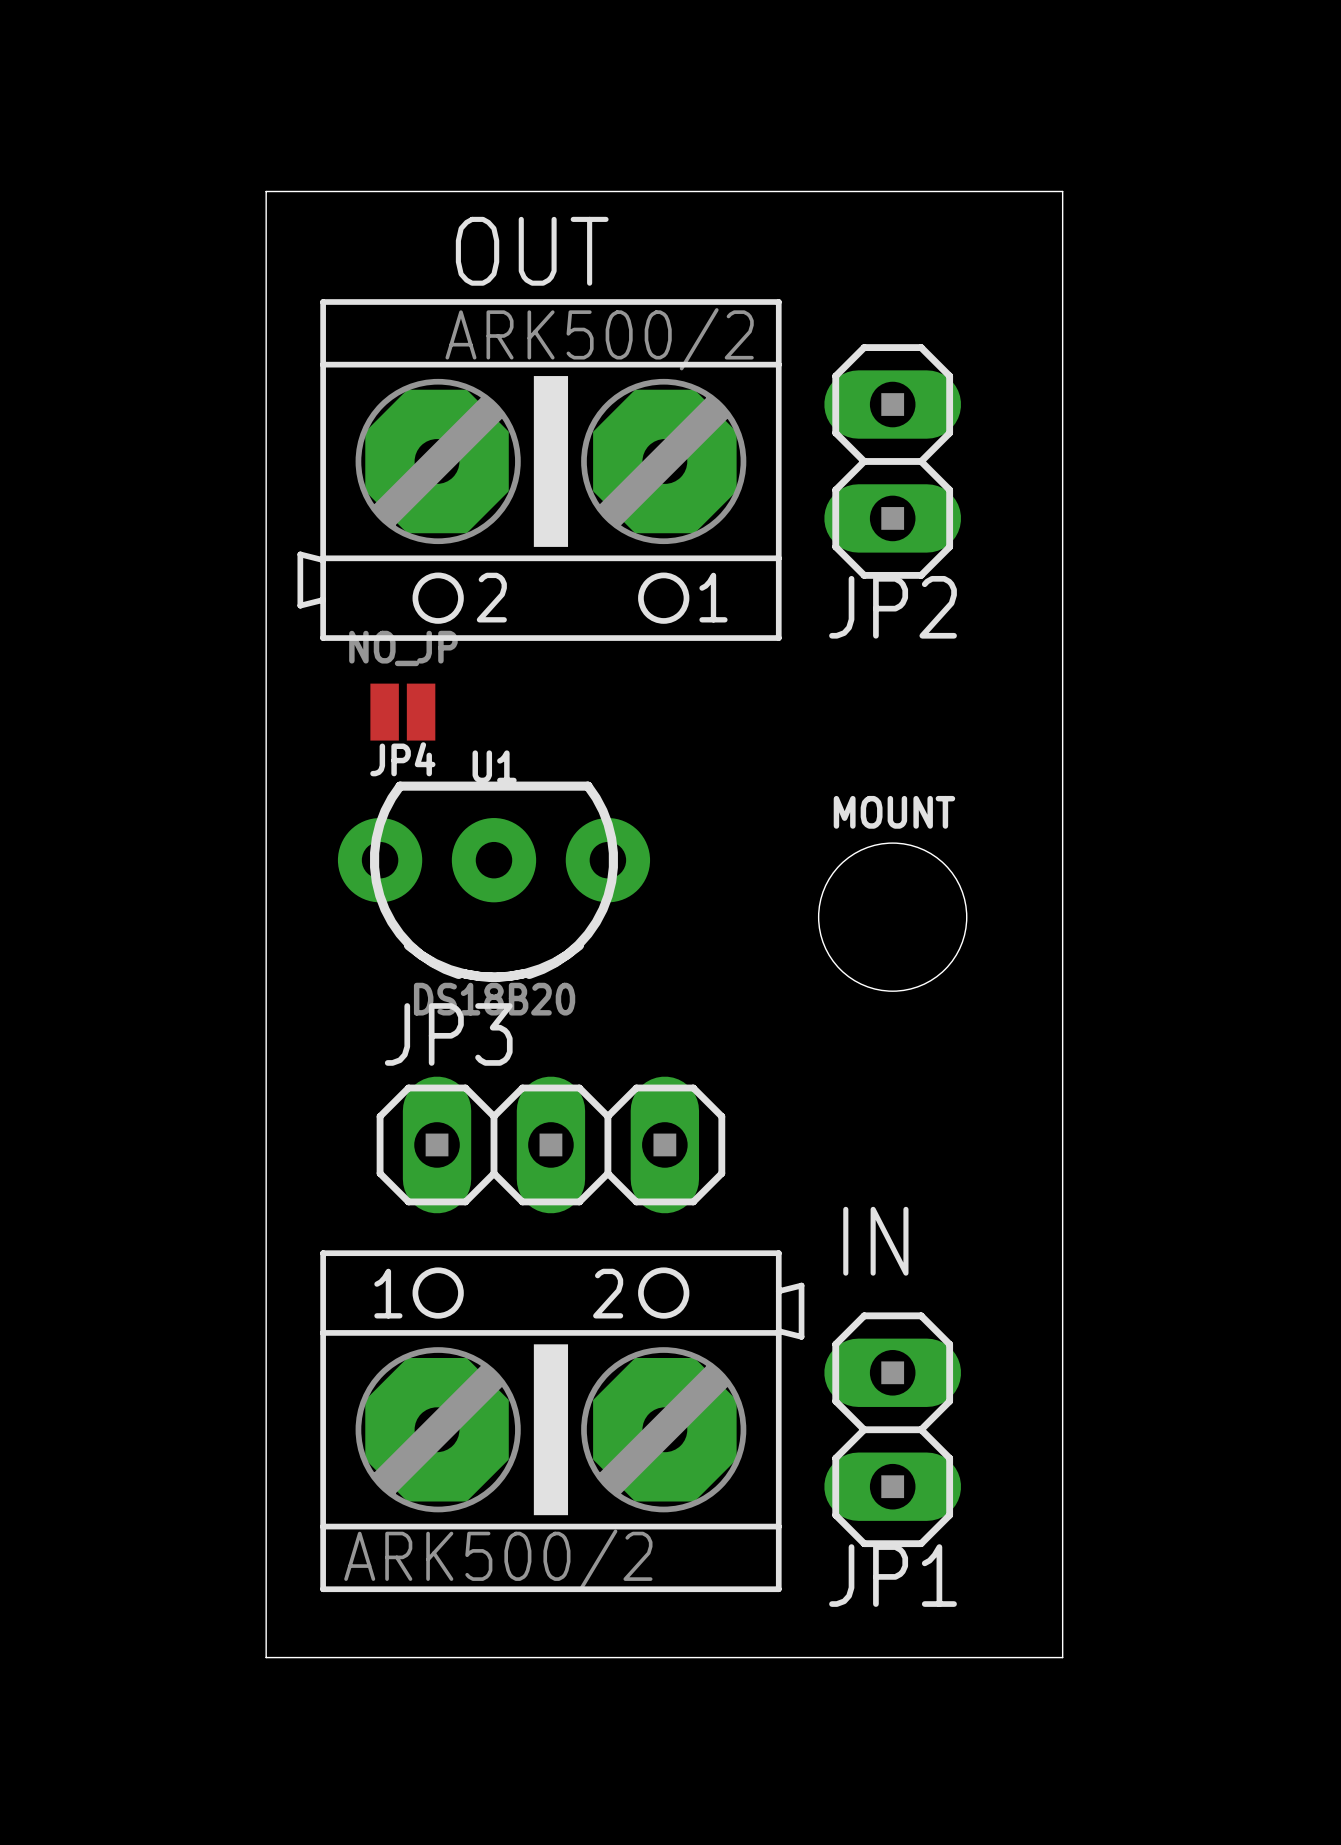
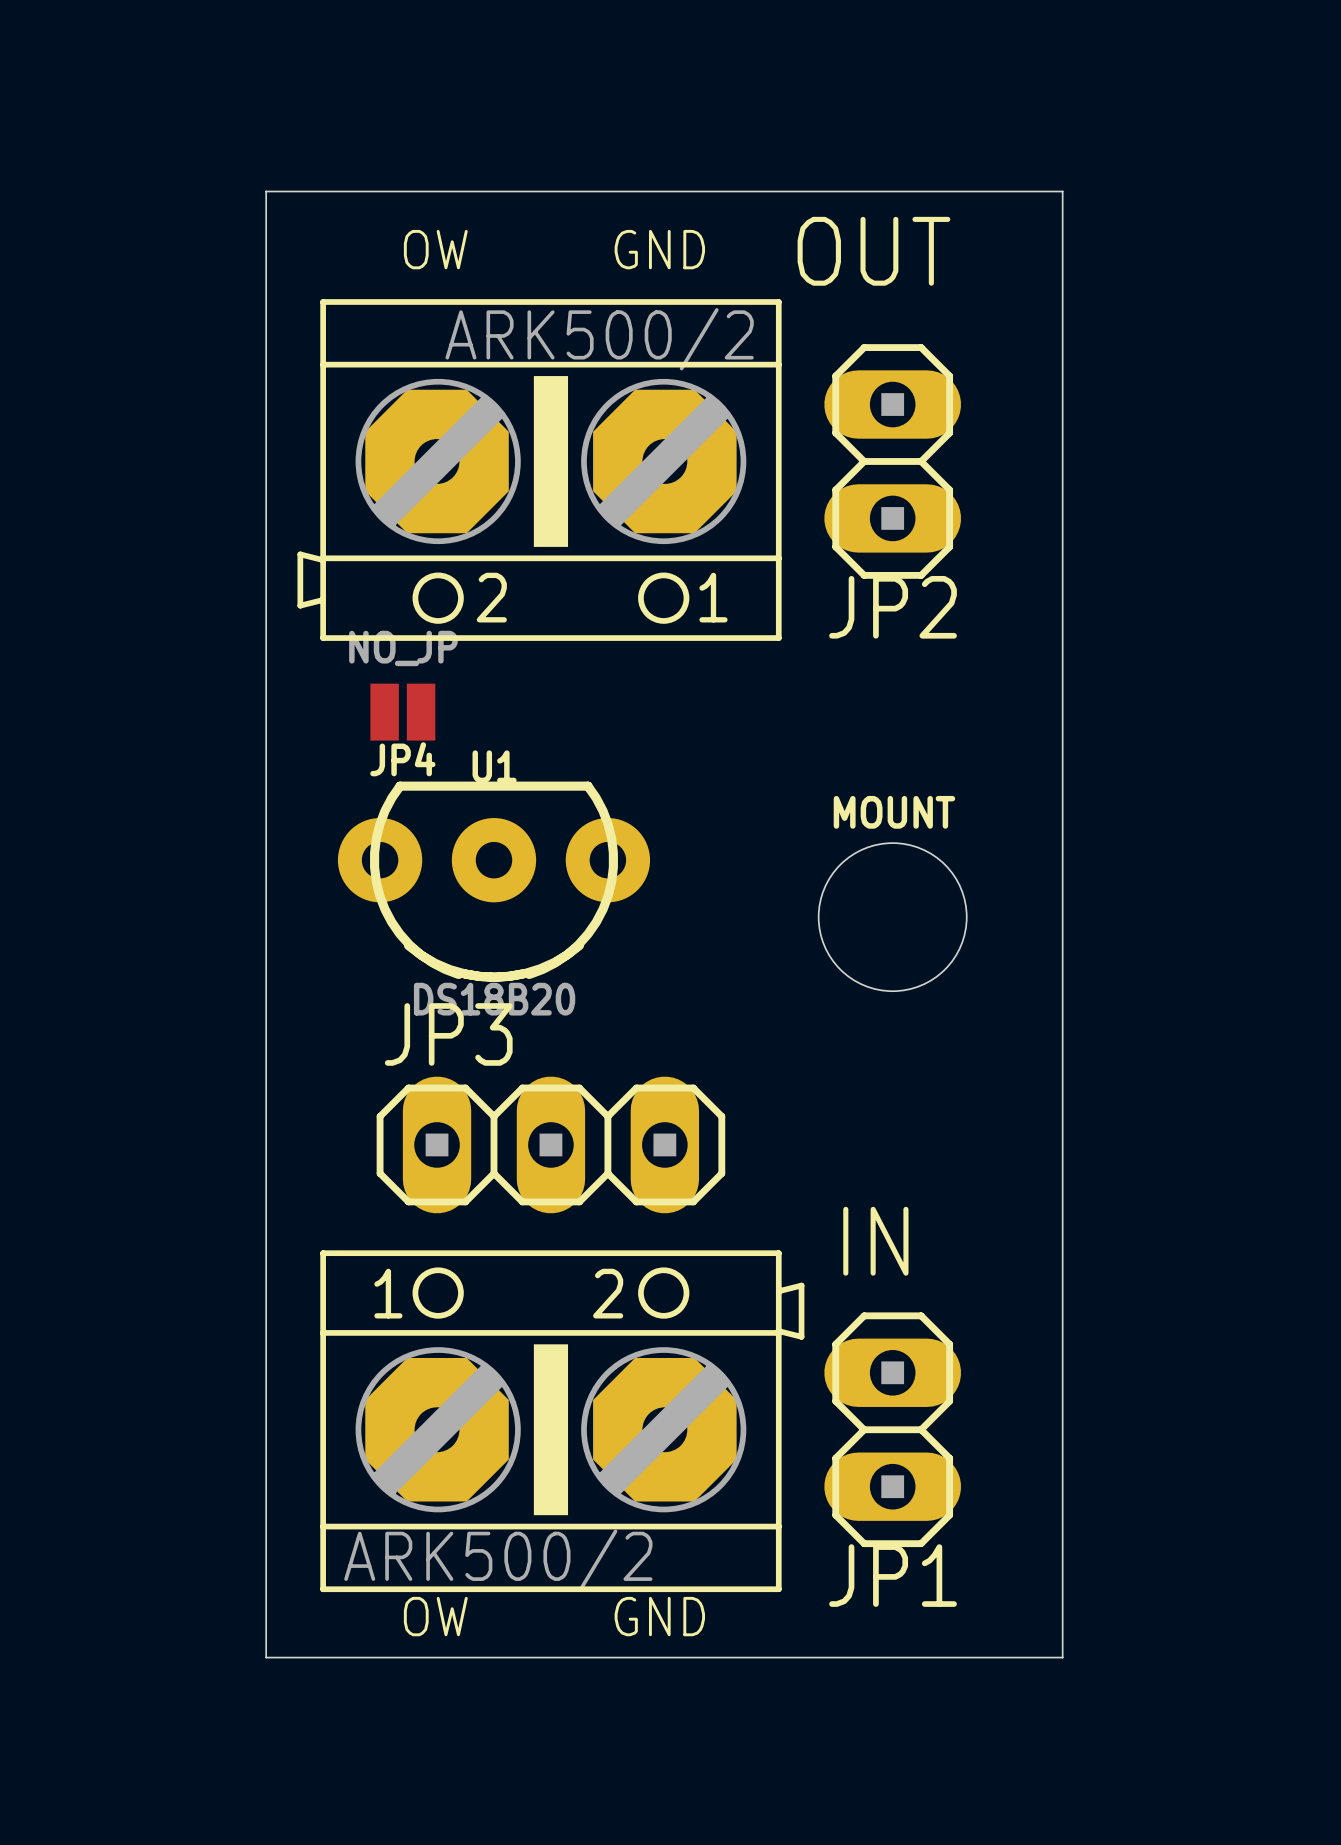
text: none -> OW (435, 249)
text: none -> GND (659, 249)
OUT name position: OUT (532, 251) -> OUT (873, 251)
text: none -> OW (435, 1616)
text: none -> GND (659, 1616)

